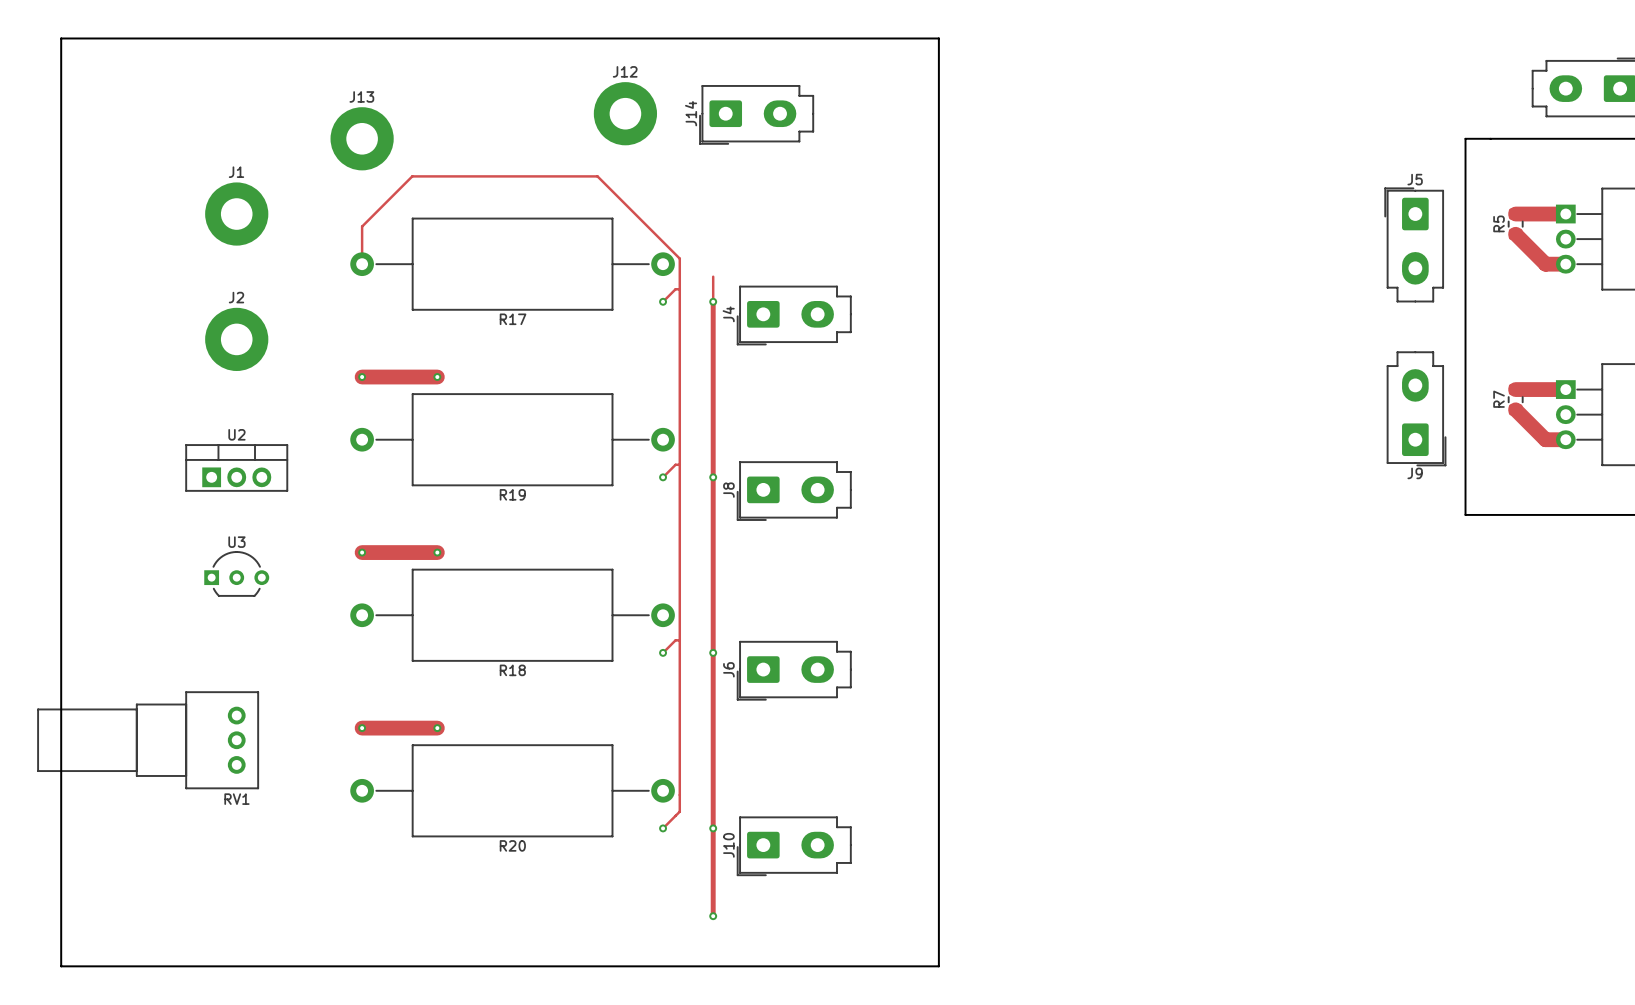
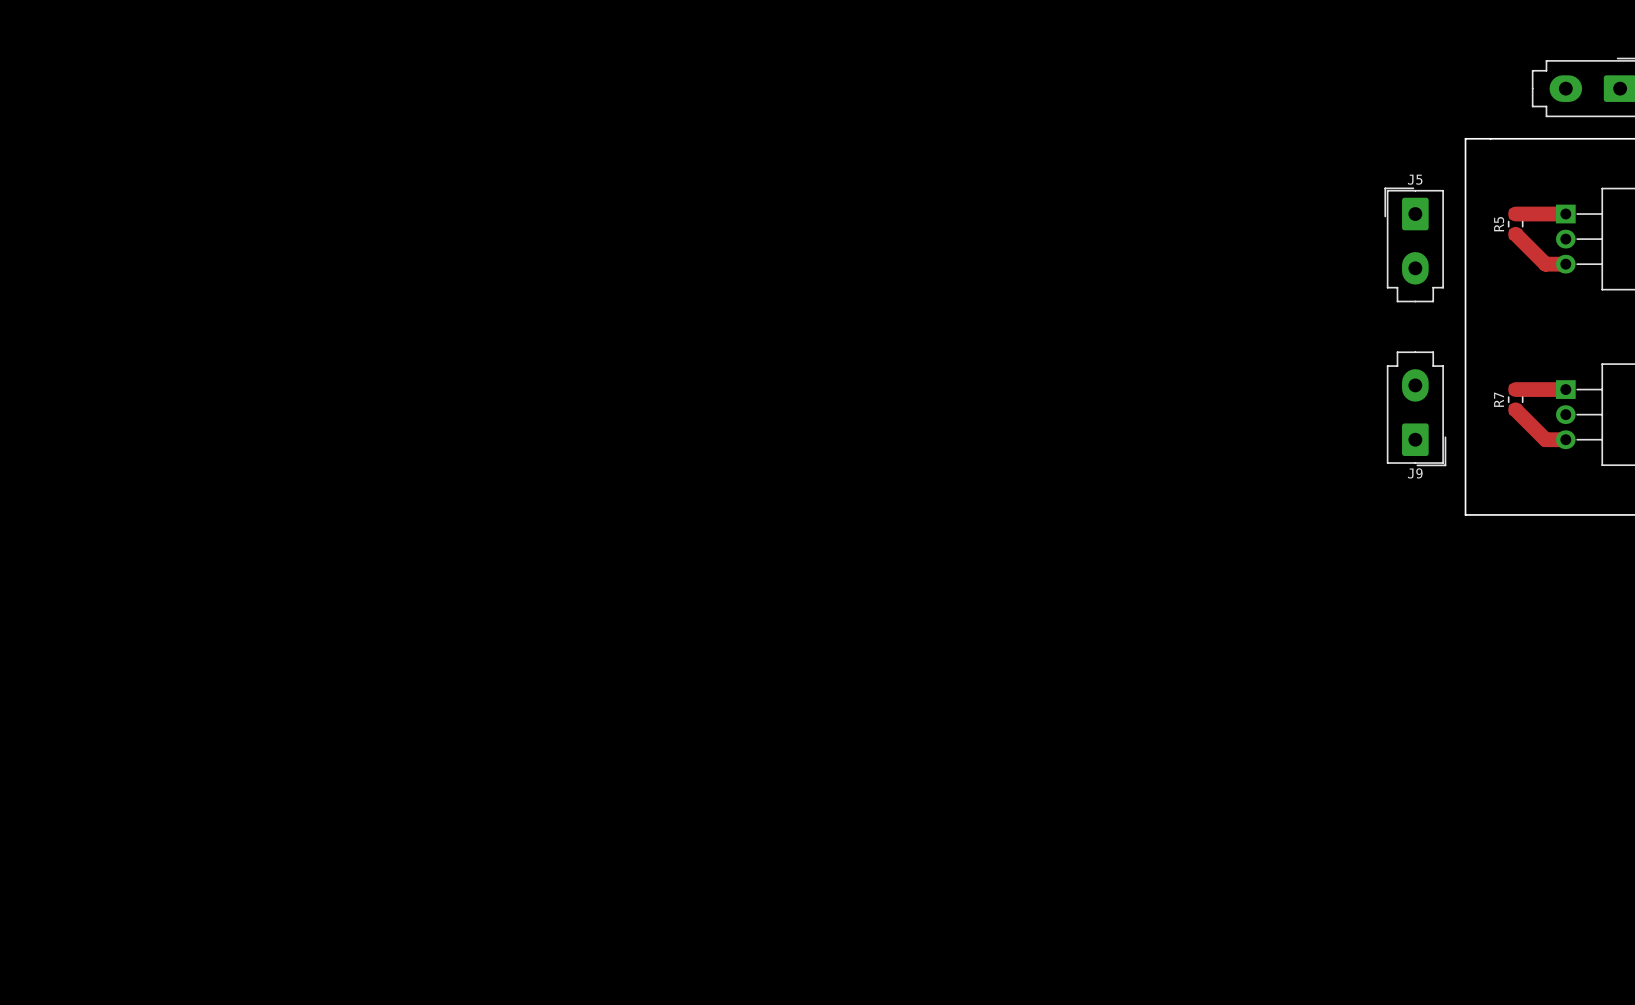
board edge: (61, 38) (938, 38) (938, 966) (61, 966) (61, 38) -> none
J12: (625, 113) -> none
J14: (756, 114) -> none
J13: (362, 138) -> none
J1: (236, 214) -> none
track: (362, 264) (362, 226) (412, 176) (597, 176) (679, 258) (679, 811) (663, 828) -> none
R17: (512, 264) -> none
track: (713, 276) (713, 916) -> none
track: (679, 289) (675, 289) (663, 301) -> none
via: (663, 301) -> none
via: (713, 301) -> none
J4: (794, 315) -> none
J2: (236, 339) -> none
track: (362, 377) (437, 377) -> none
via: (362, 377) -> none
via: (437, 377) -> none
R19: (512, 439) -> none
track: (679, 464) (675, 464) (663, 477) -> none
U2: (236, 467) -> none
via: (663, 477) -> none
via: (713, 477) -> none
J8: (794, 491) -> none
track: (362, 552) (437, 552) -> none
via: (362, 552) -> none
via: (437, 552) -> none
U3: (236, 573) -> none
R18: (512, 615) -> none
track: (679, 640) (675, 640) (663, 652) -> none
via: (663, 652) -> none
via: (713, 652) -> none
J6: (794, 670) -> none
track: (362, 728) (437, 728) -> none
via: (362, 728) -> none
via: (437, 728) -> none
RV1: (148, 740) -> none
R20: (512, 790) -> none
via: (663, 828) -> none
via: (713, 828) -> none
J10: (794, 846) -> none
via: (713, 916) -> none

